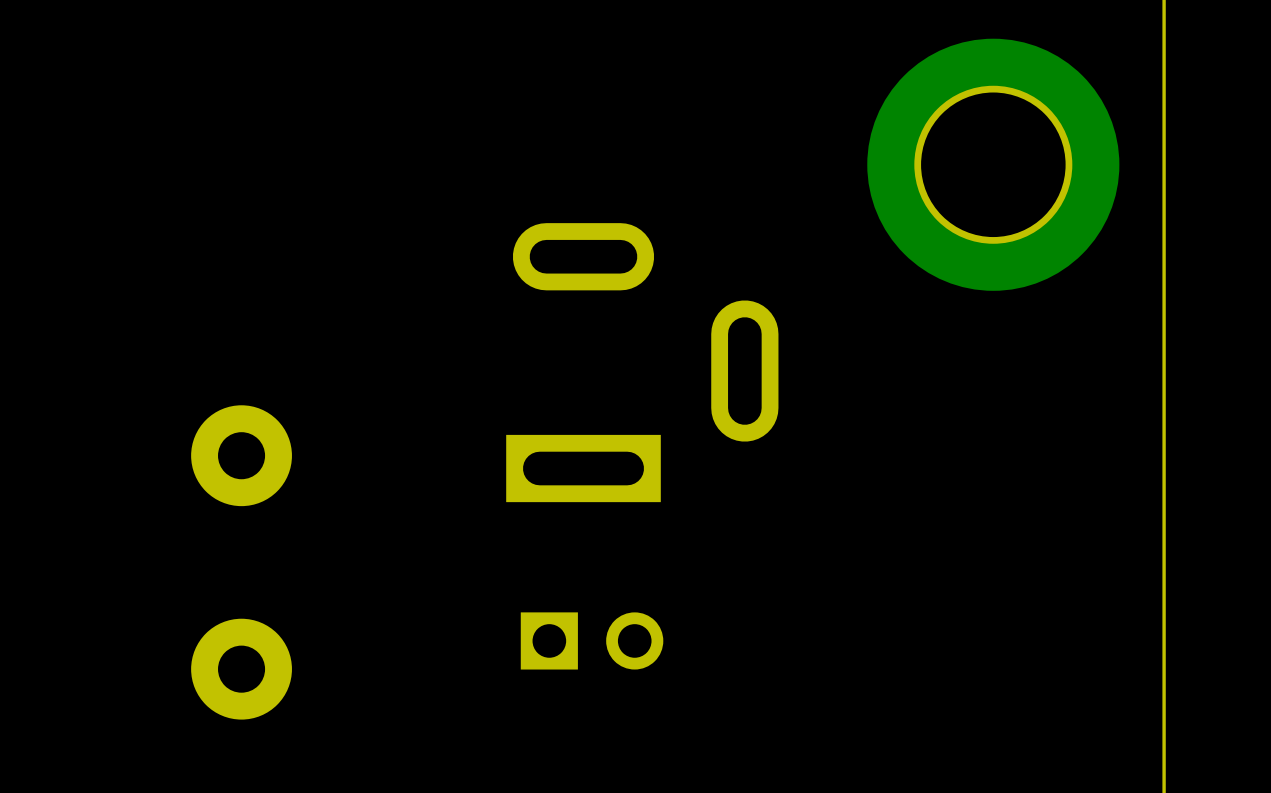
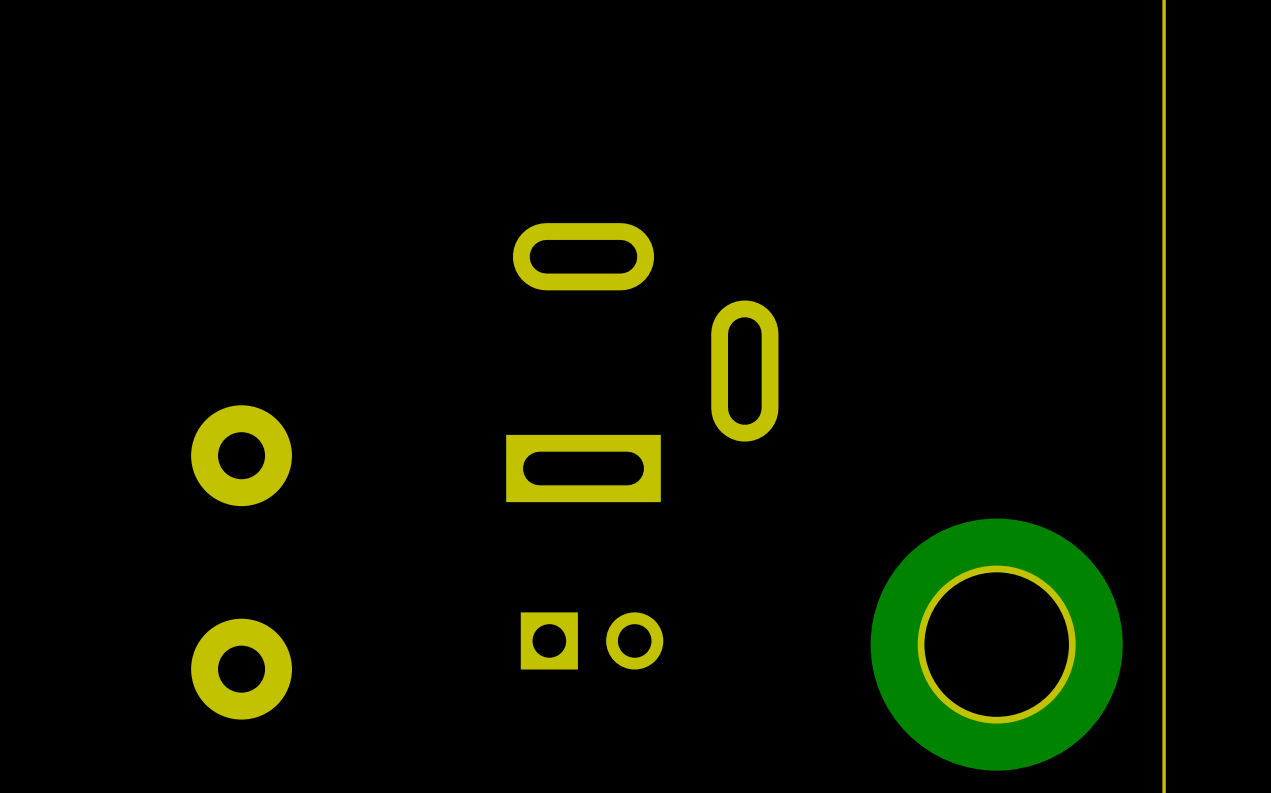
part position: (993, 164) -> (996, 644)

